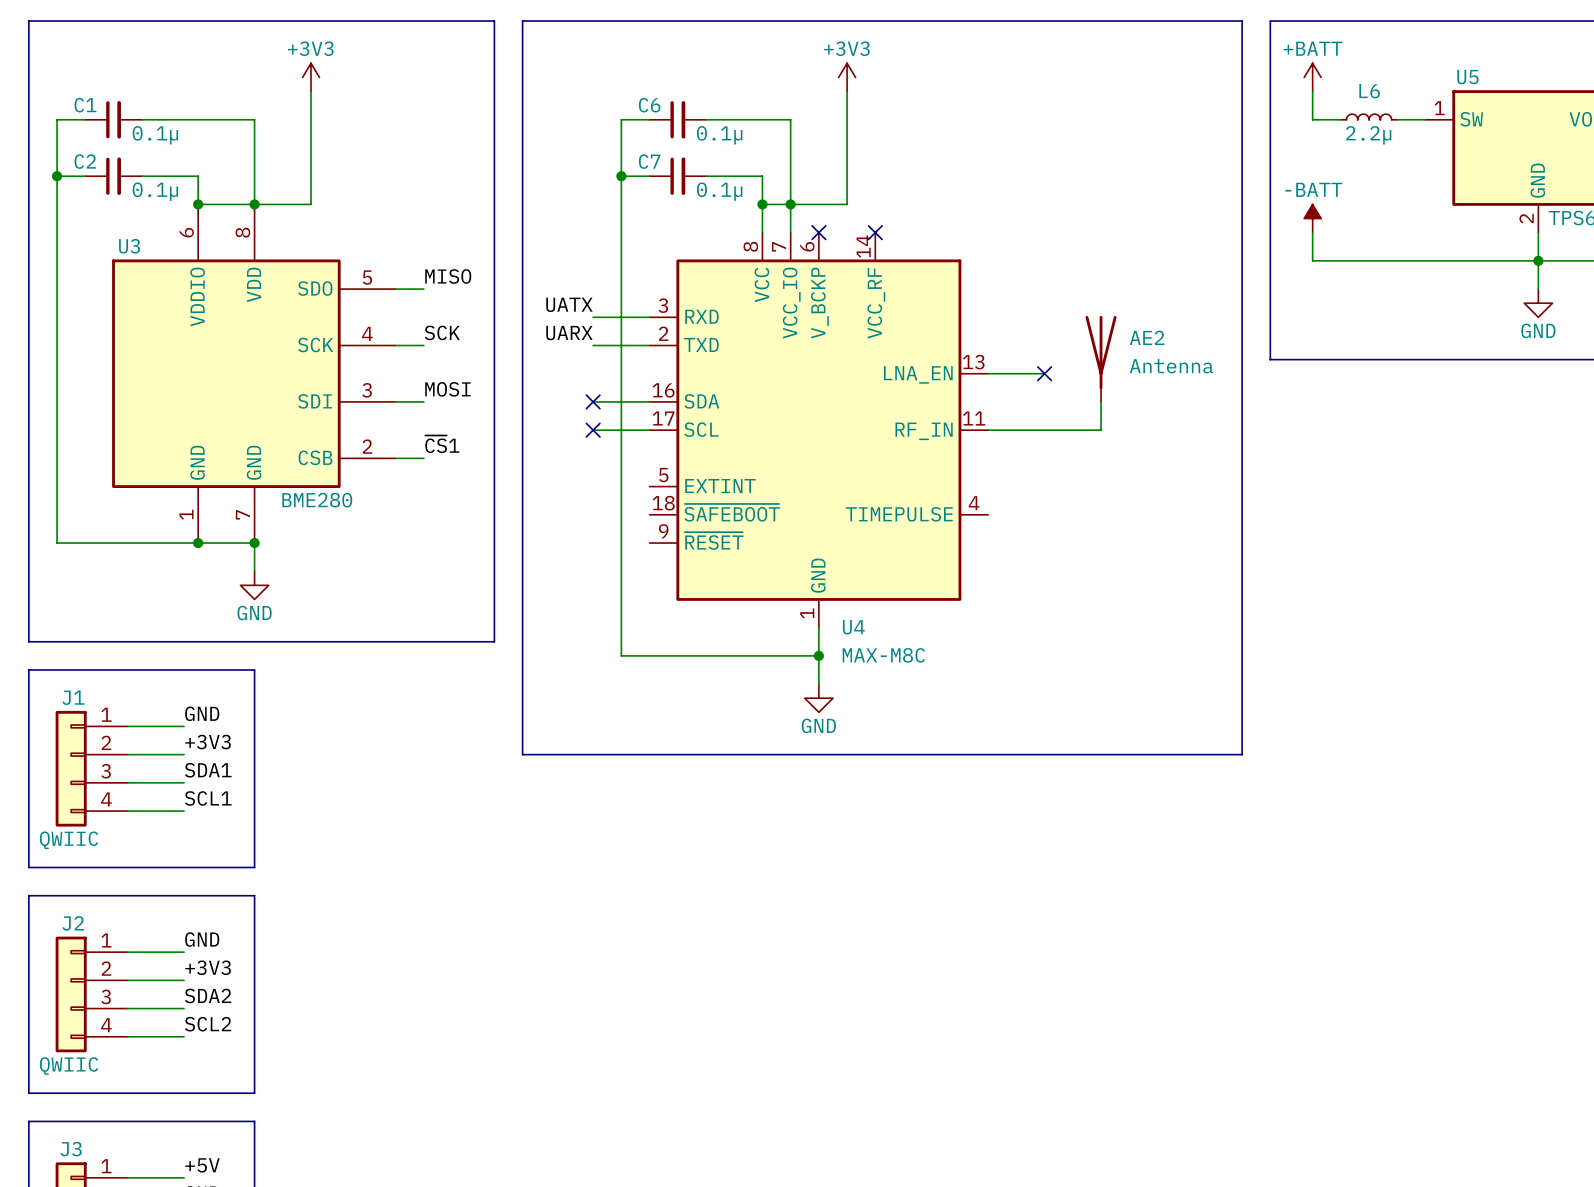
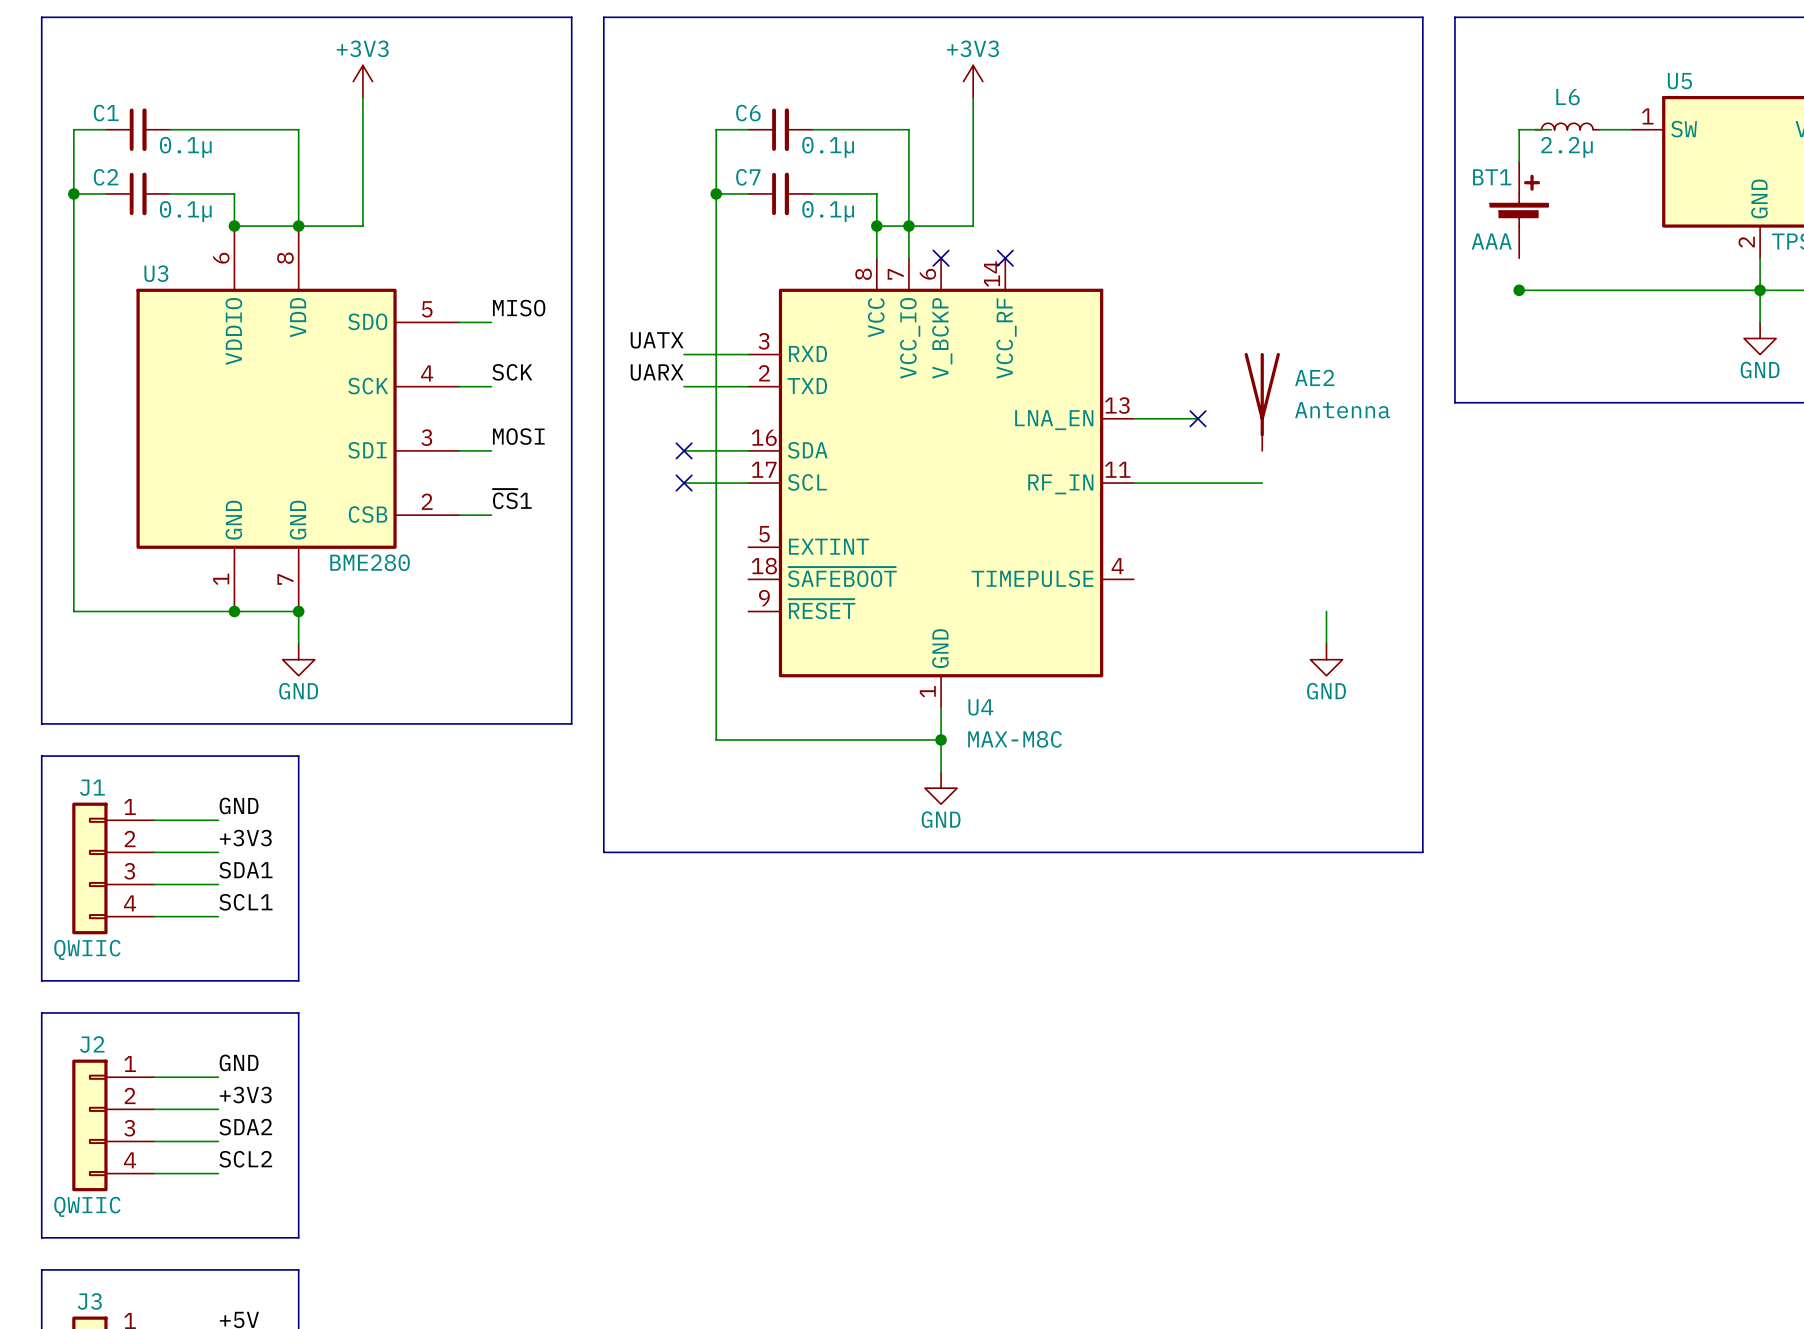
power symbol: +BATT (1312, 77) -> none
wire: (1312, 91) (1312, 119) (1326, 119) -> (1519, 161) (1519, 129)
wire: none -> (1535, 129) (1551, 129)
BT1: none -> AAA (1519, 210)
power symbol: -BATT (1312, 218) -> none
wire: (1312, 232) (1312, 260) (1326, 260) -> none
junction: none -> (1519, 290)
wire: (1101, 401) (1101, 430) -> (1326, 611) (1326, 643)
power symbol: none -> GND (1326, 659)

